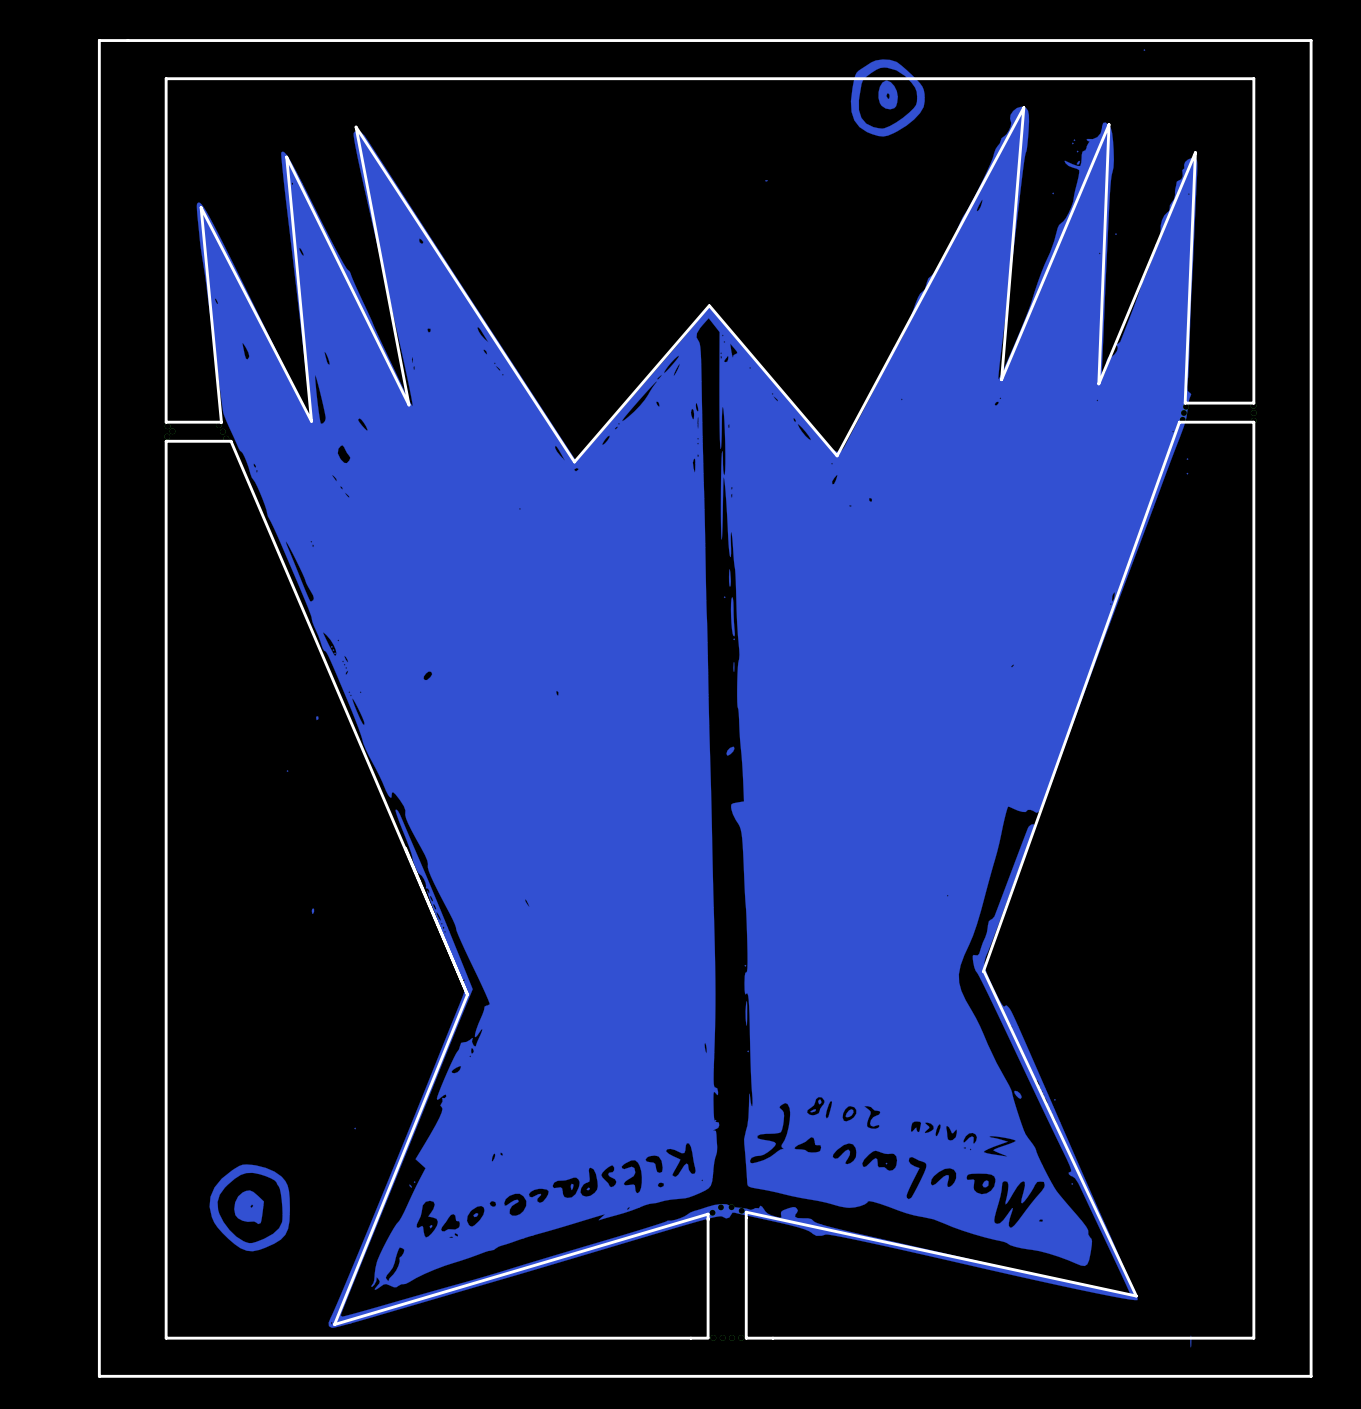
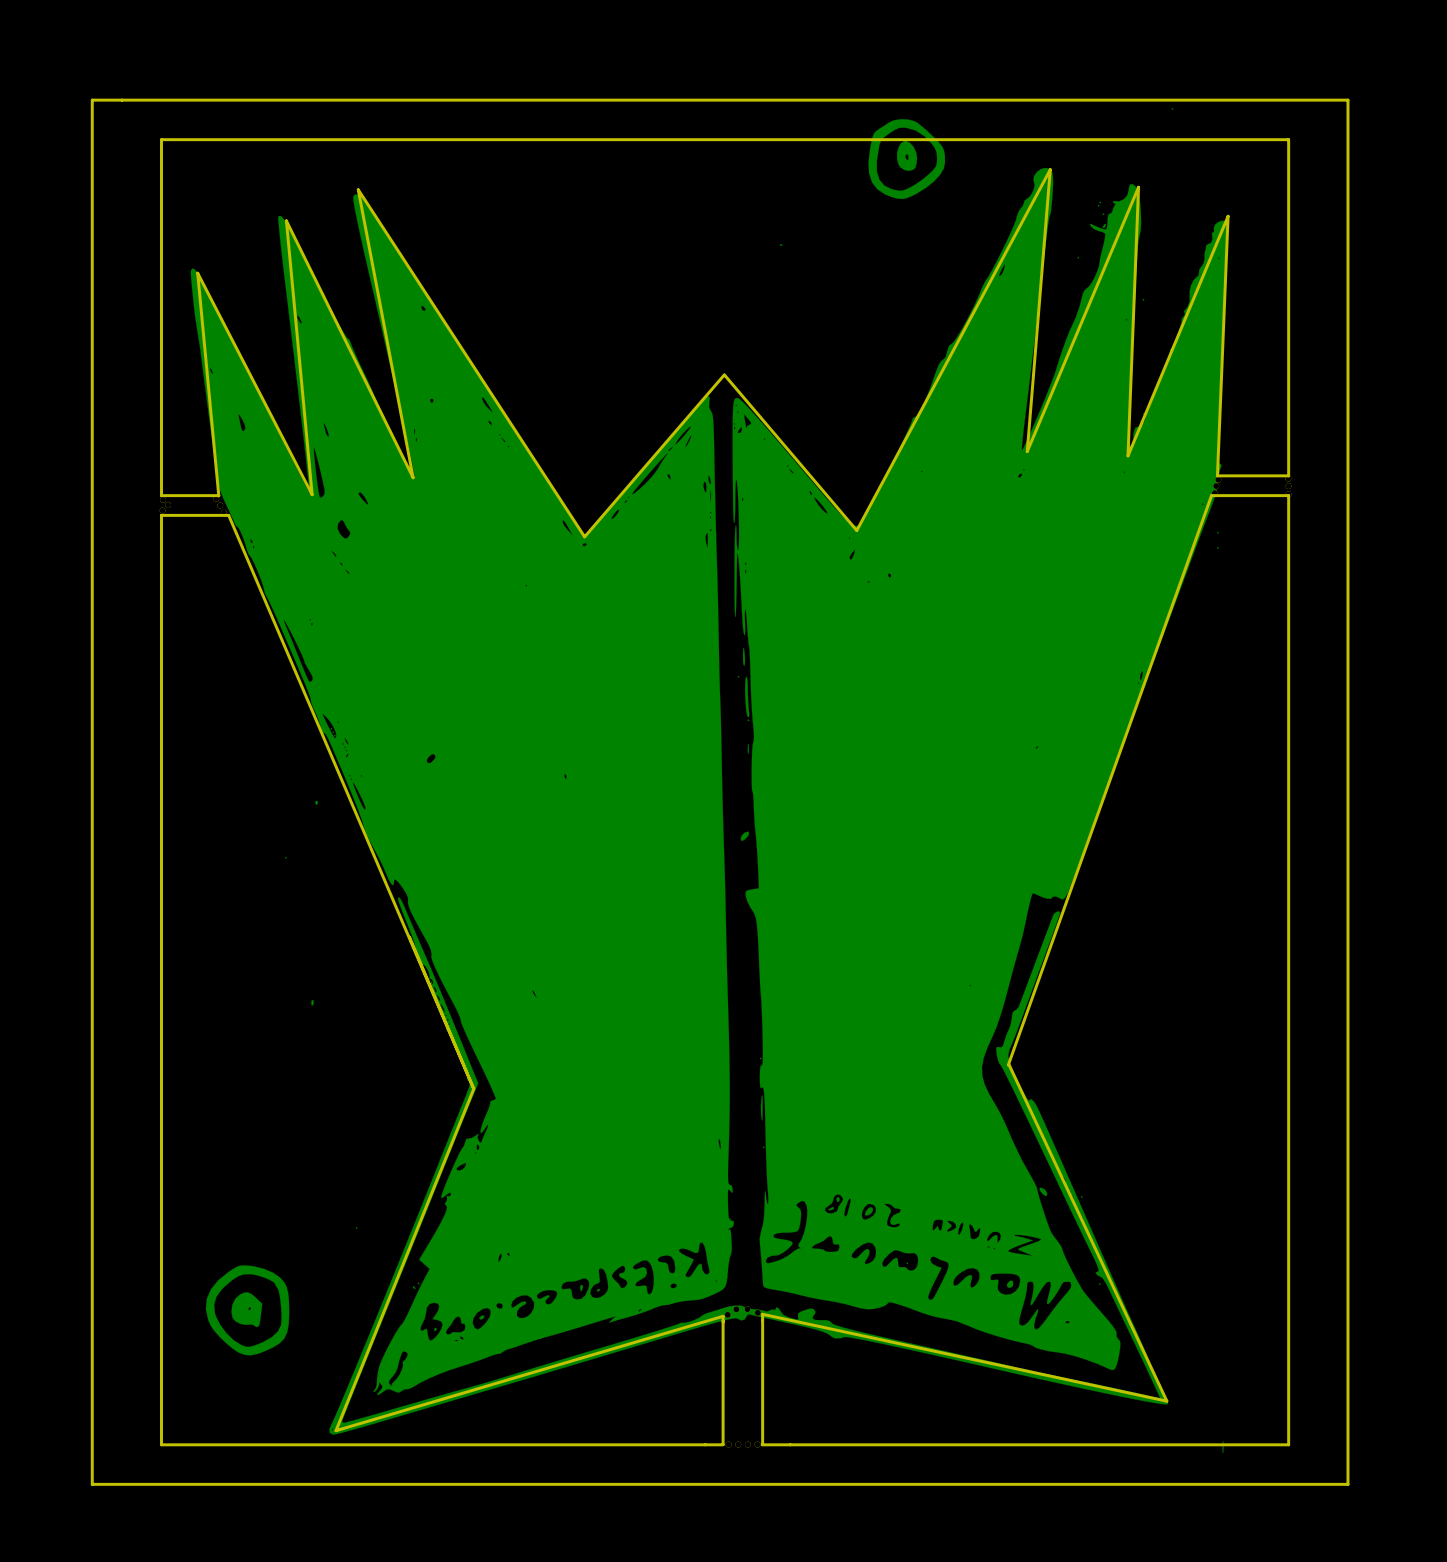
drawing shape: [196, 49, 1198, 1348] -> [190, 108, 1228, 1454]

